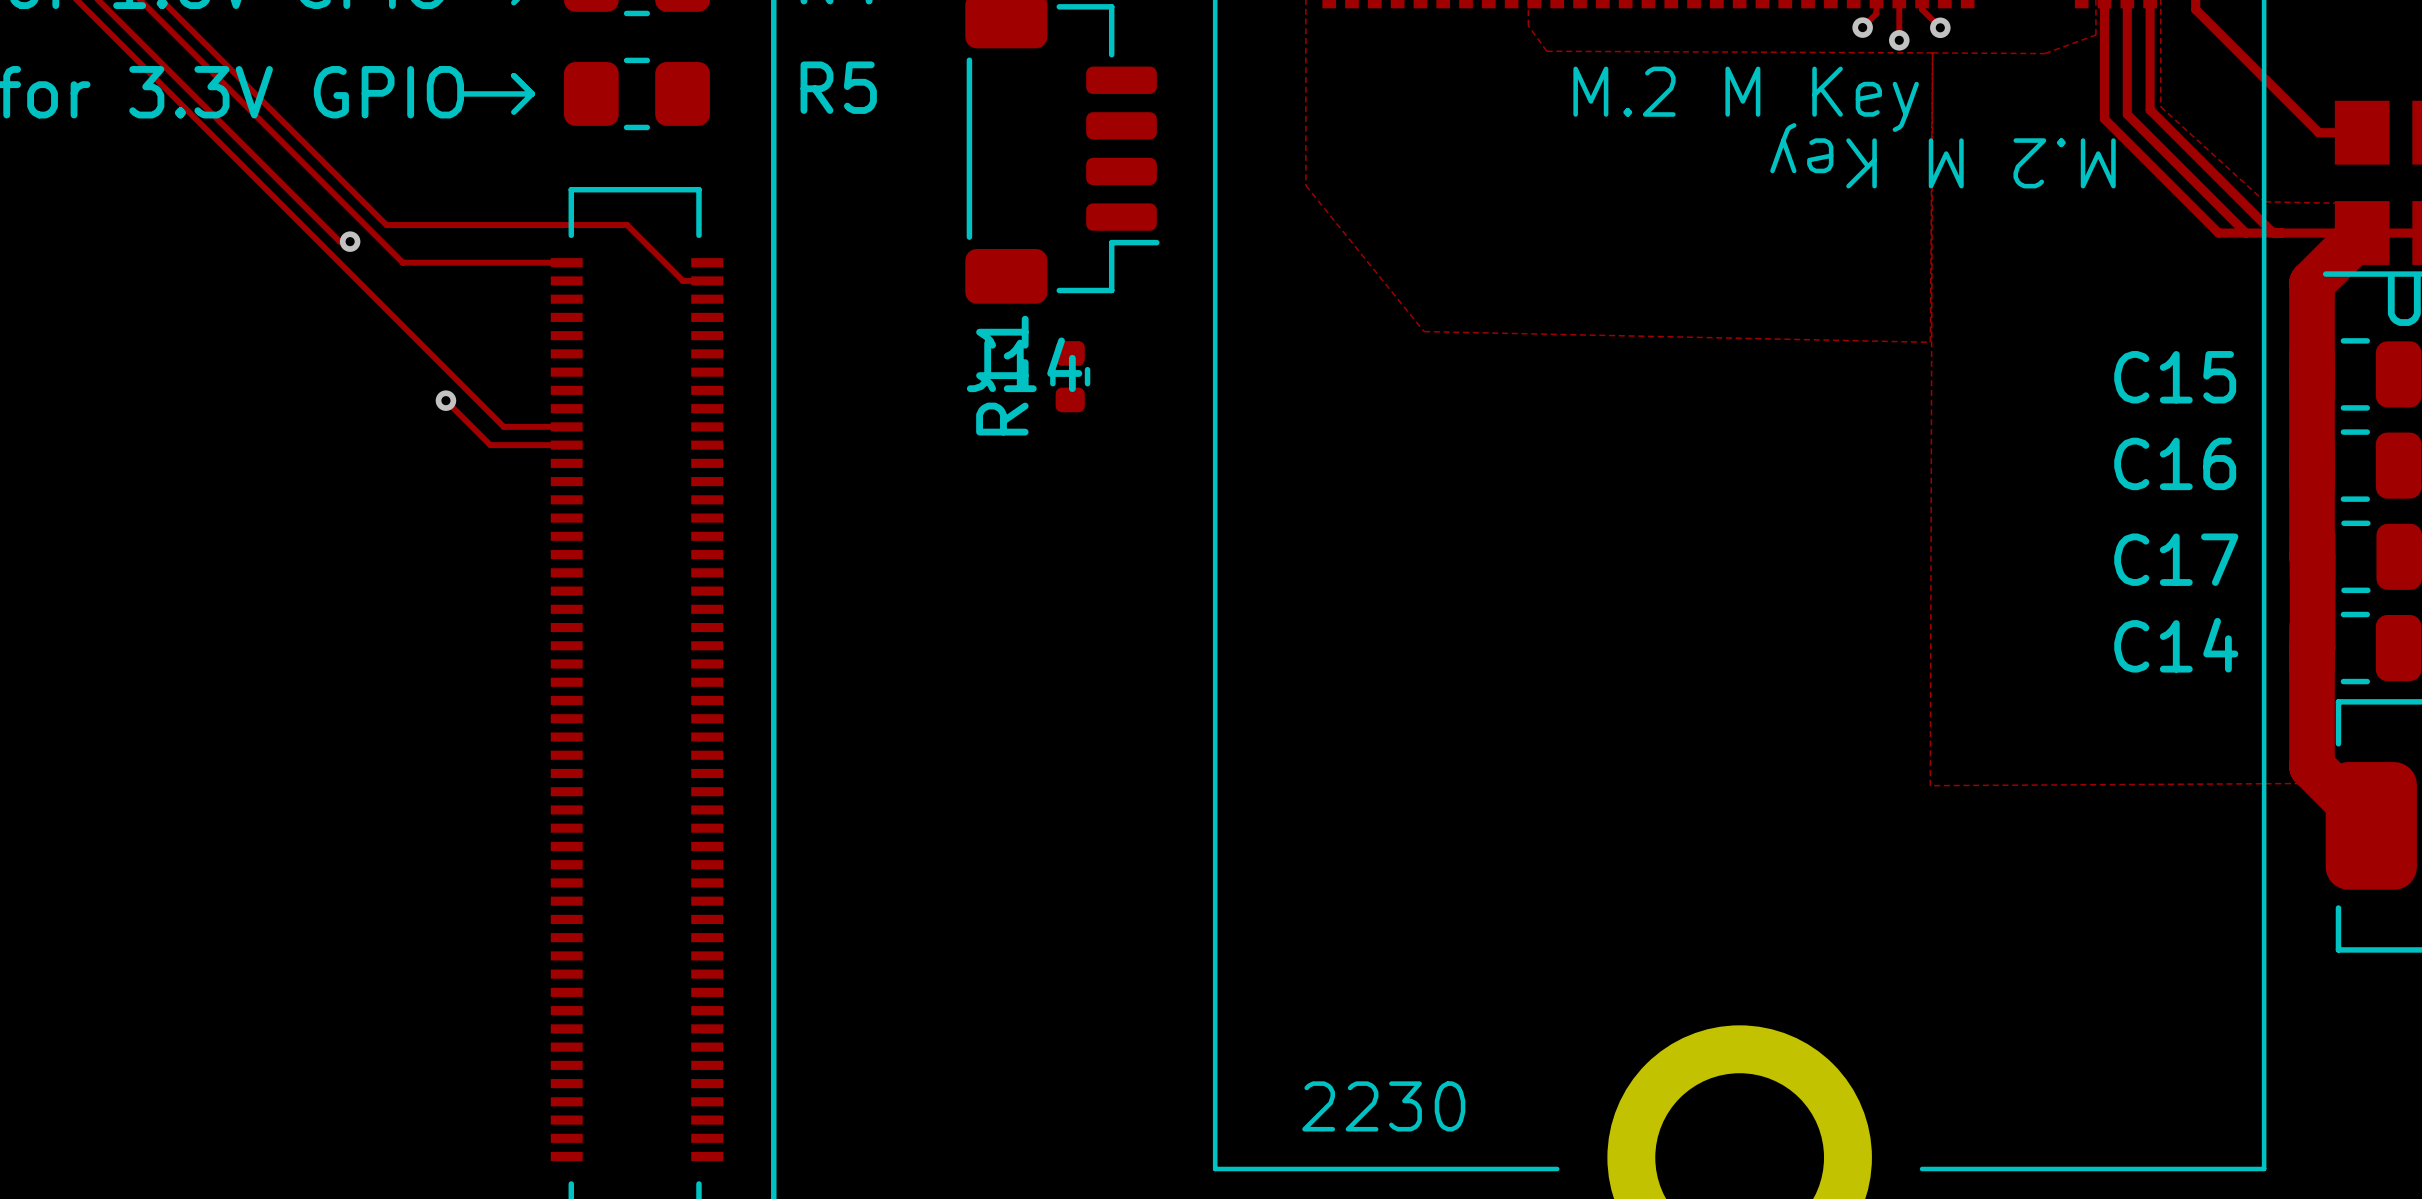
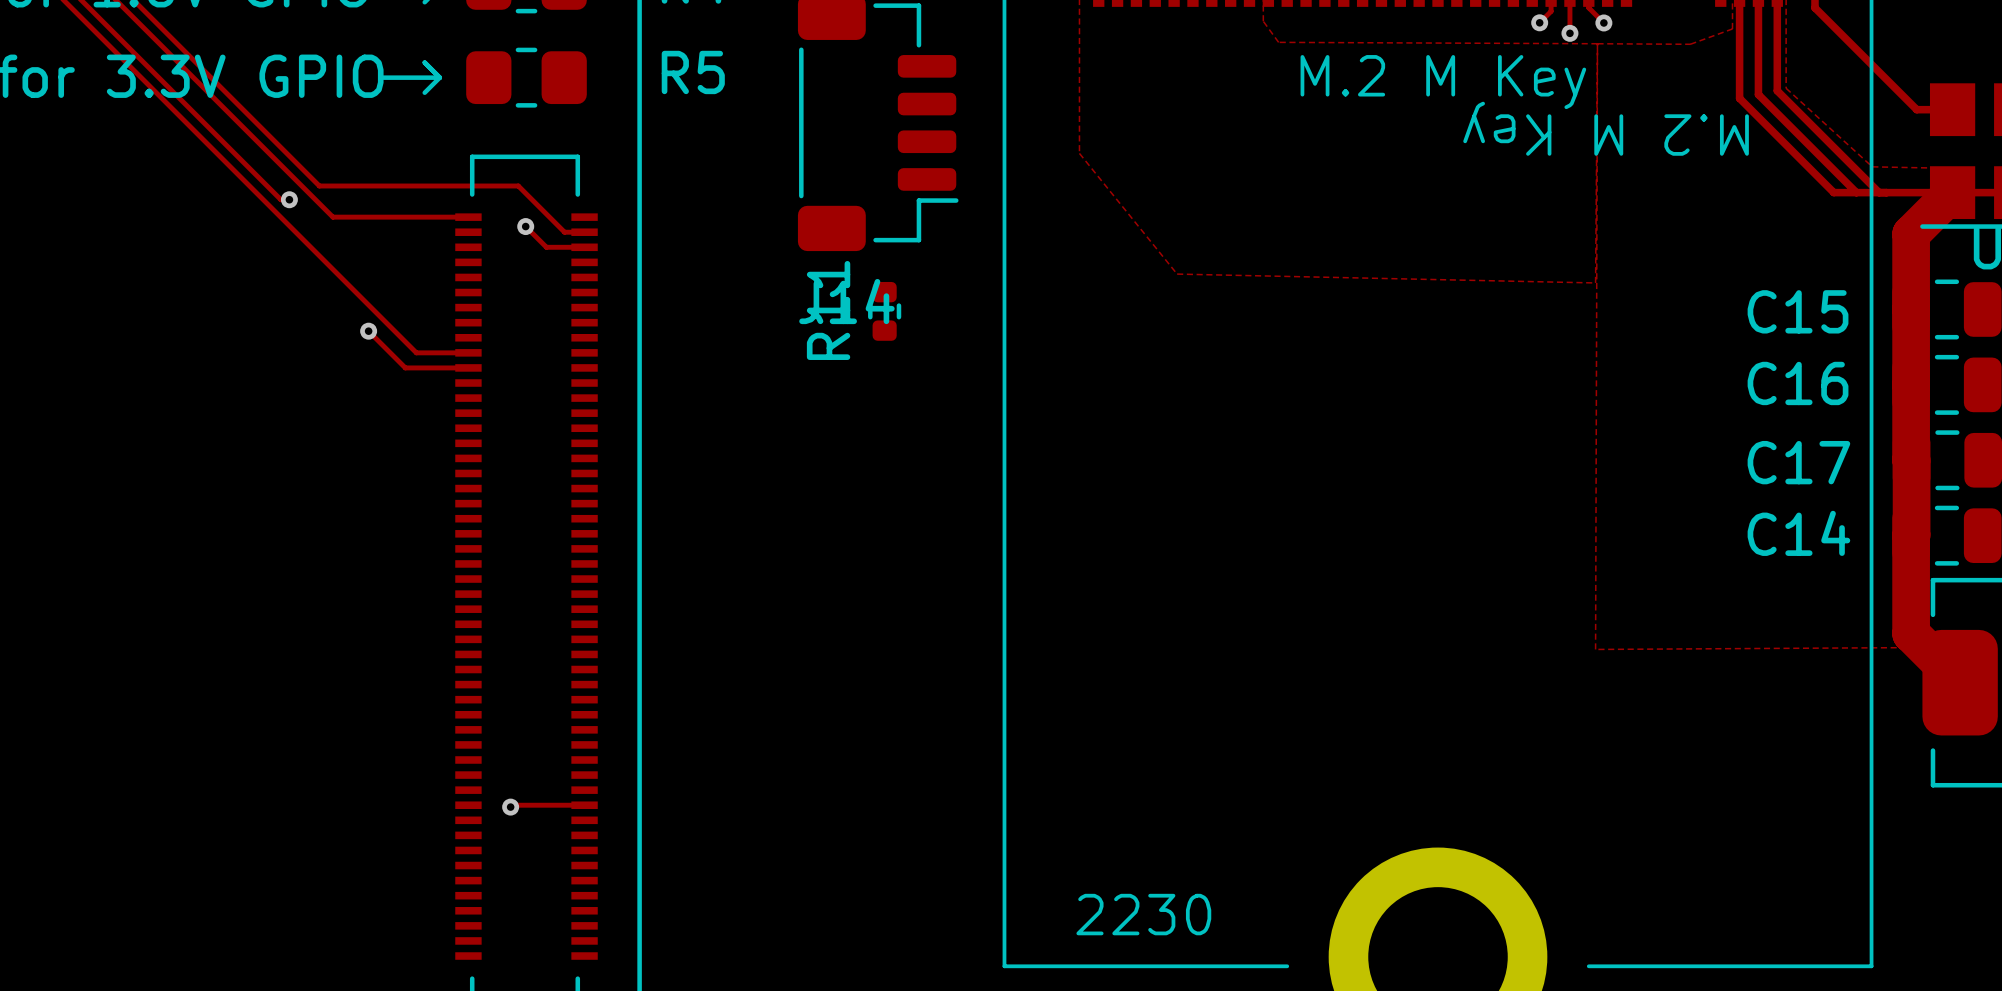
track: none -> (525, 226) (546, 247) (584, 247)
via: none -> (525, 226)
track: none -> (584, 805) (512, 805) (510, 807)
via: none -> (510, 807)

